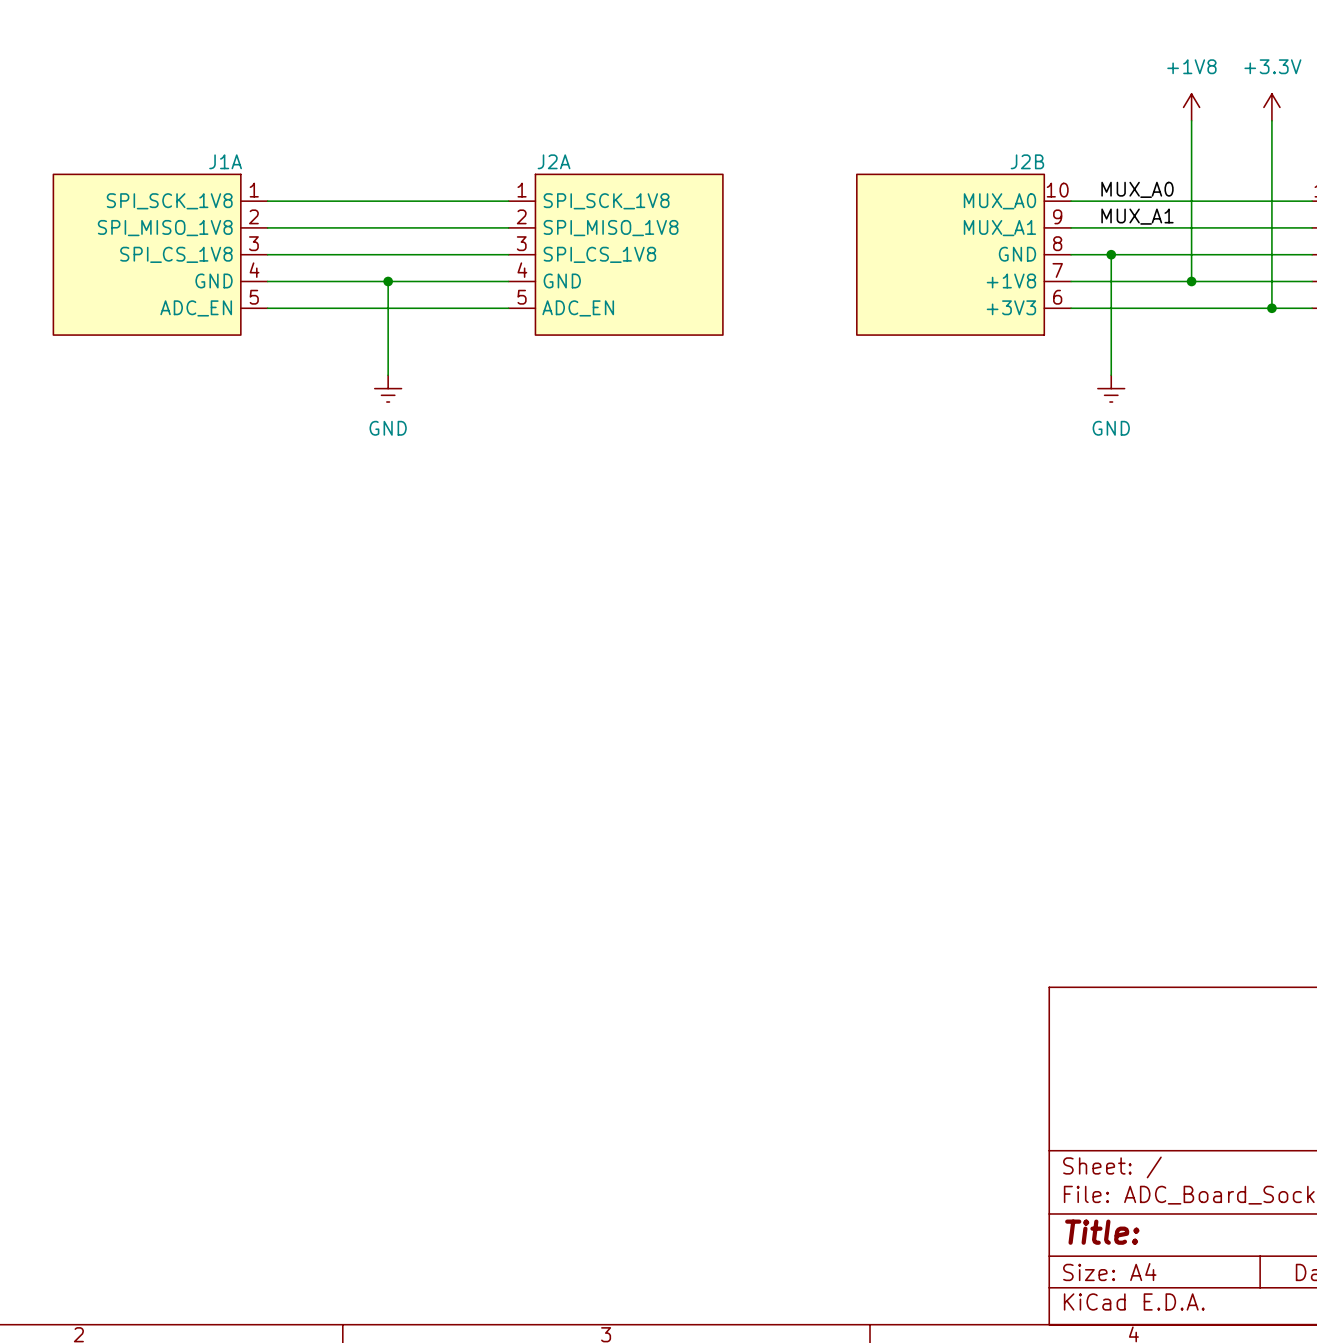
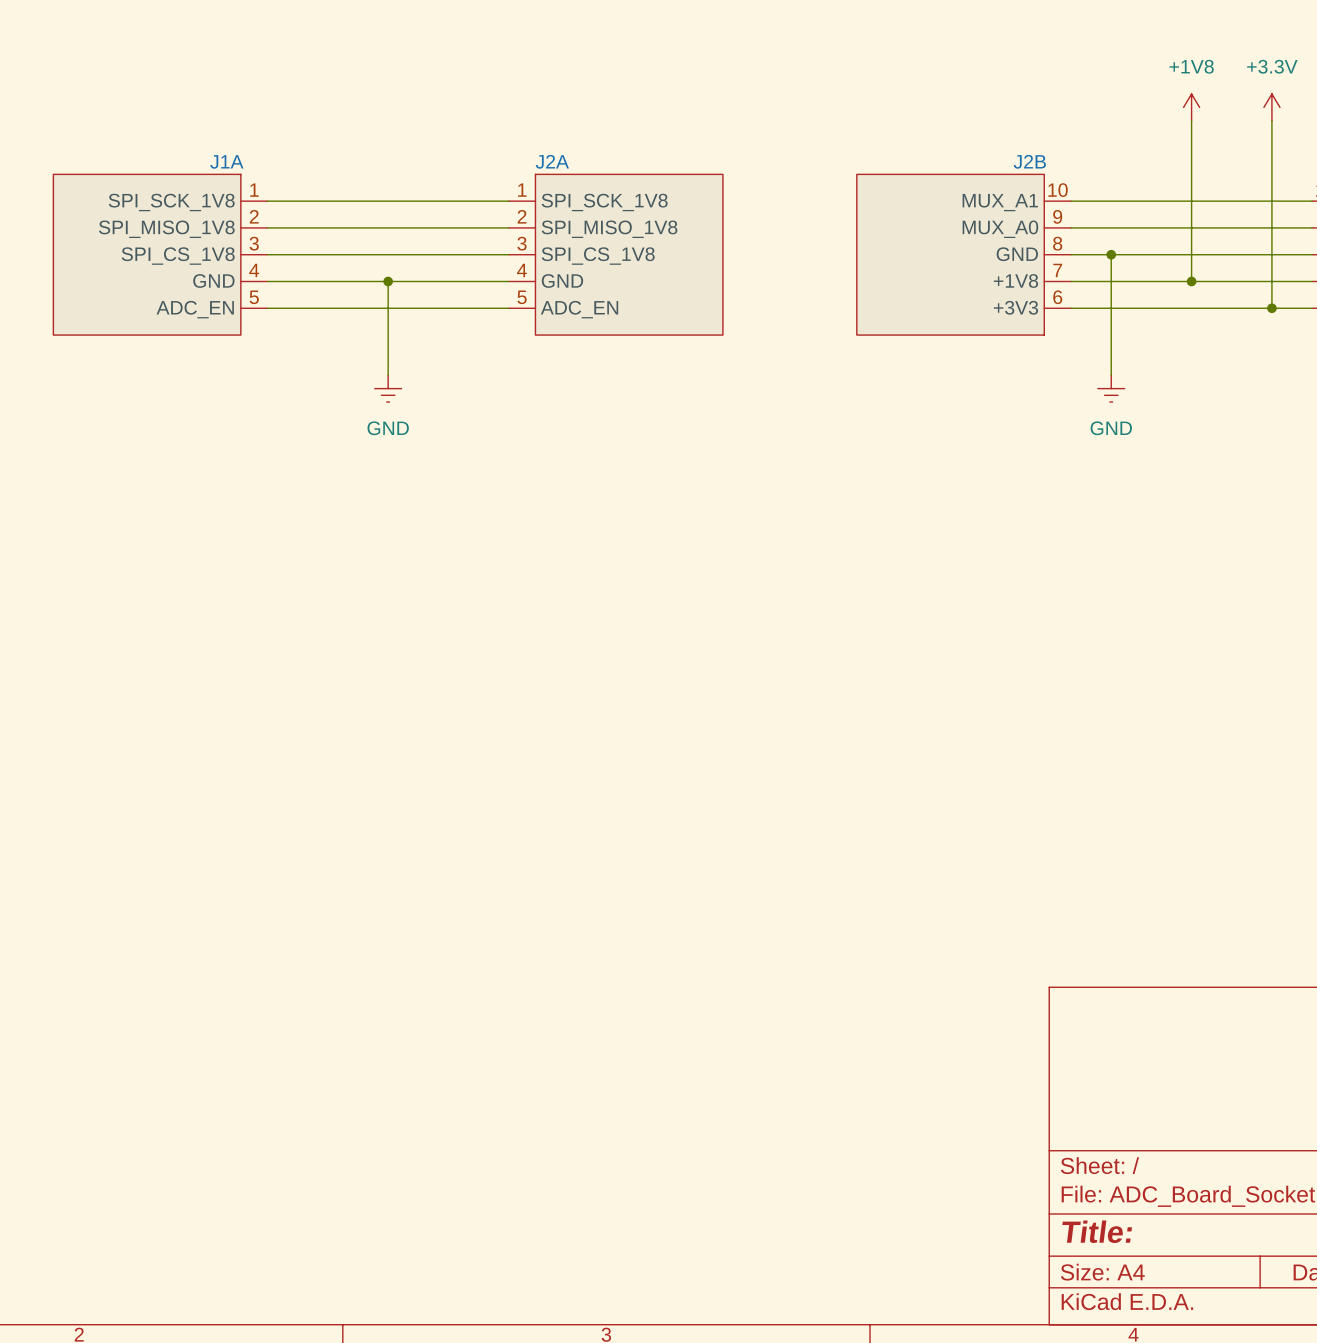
label: MUX_A0 (1137, 189) -> none
J2B pin name: MUX_A0 (999, 201) -> MUX_A1 (1000, 202)
label: MUX_A1 (1137, 216) -> none
J2B pin name: MUX_A1 (999, 228) -> MUX_A0 (1000, 229)

